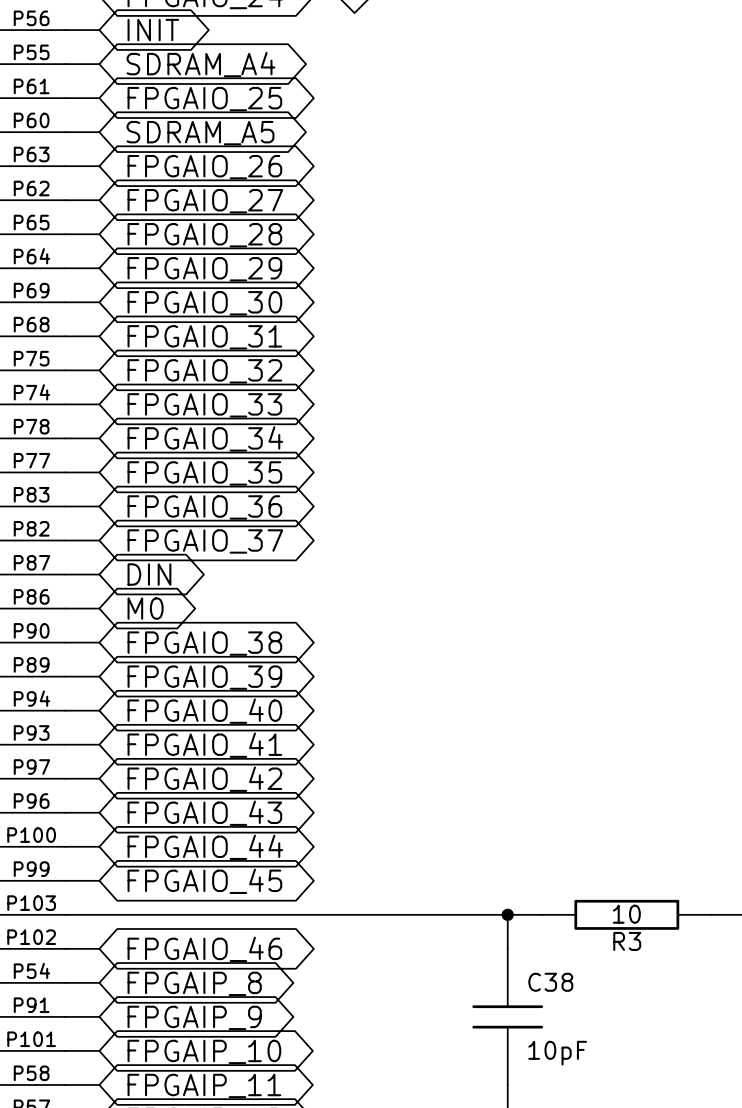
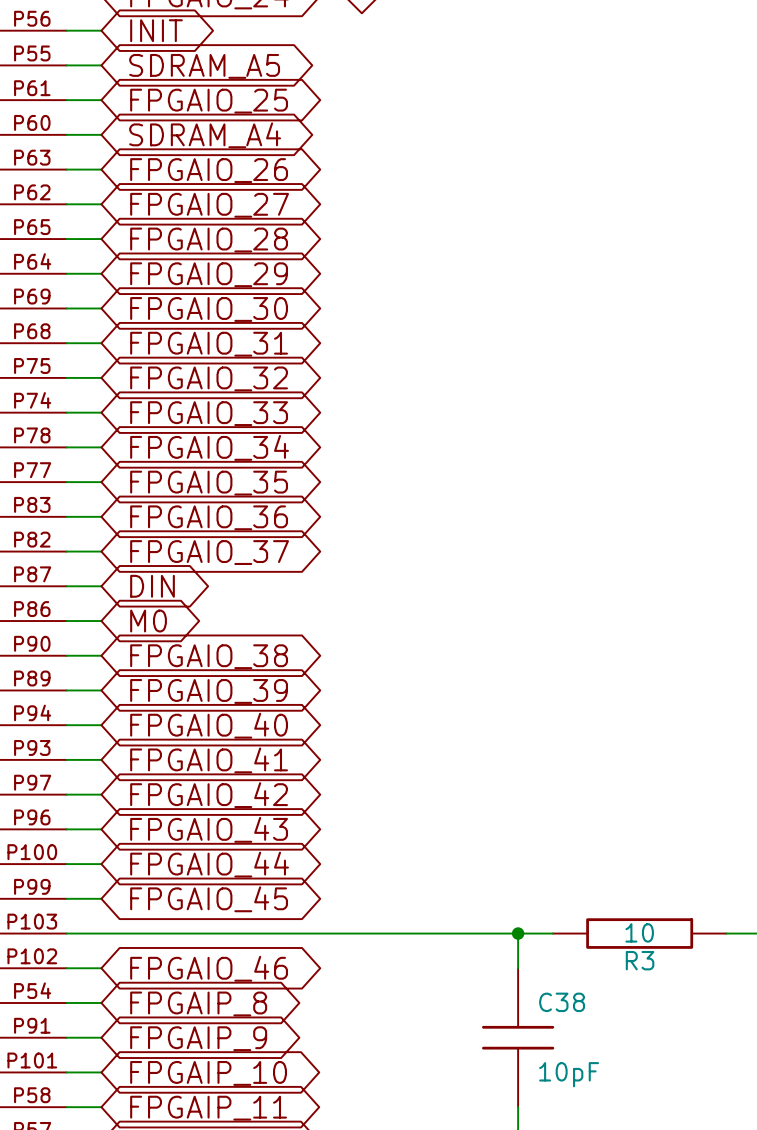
global label: SDRAM_A4 (200, 64) -> SDRAM_A5 (204, 66)
global label: SDRAM_A5 (200, 133) -> SDRAM_A4 (205, 135)

